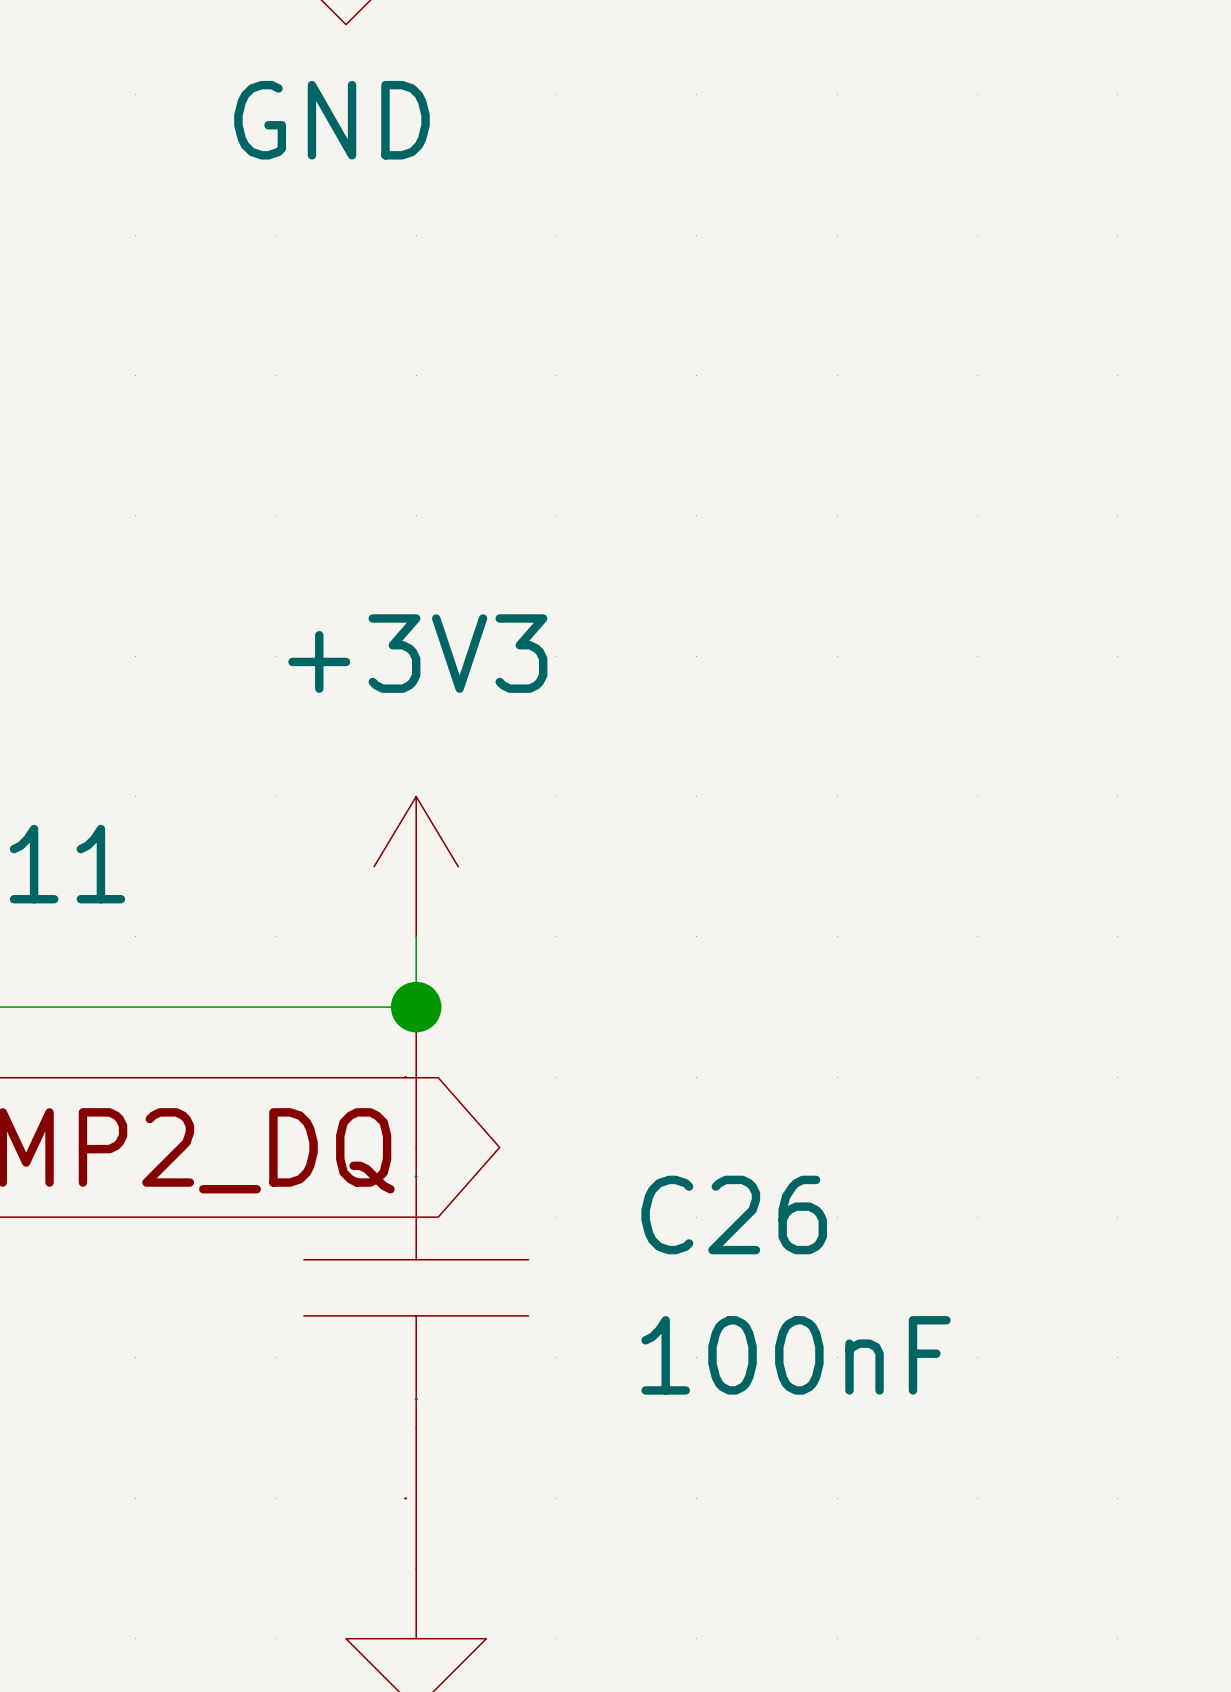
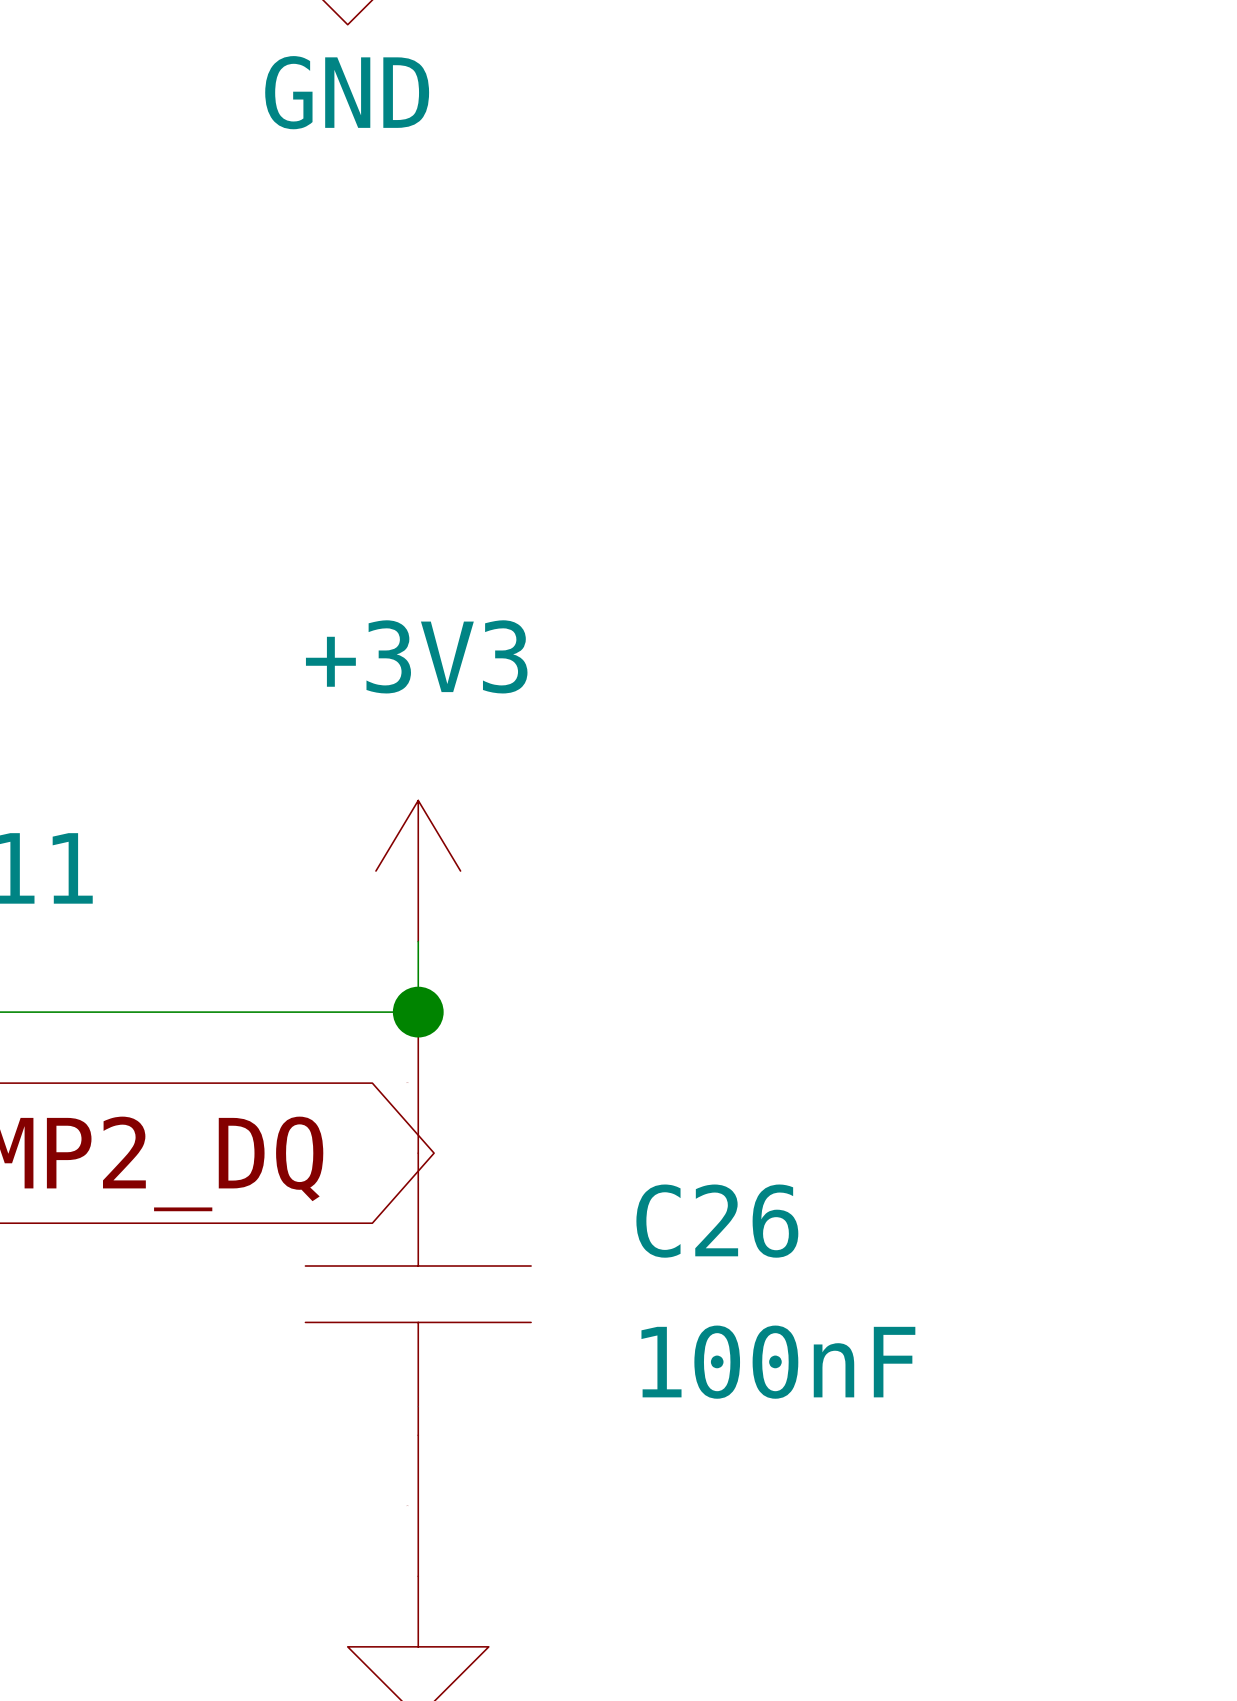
power symbol text position: GND (331, 120) -> GND (347, 92)

